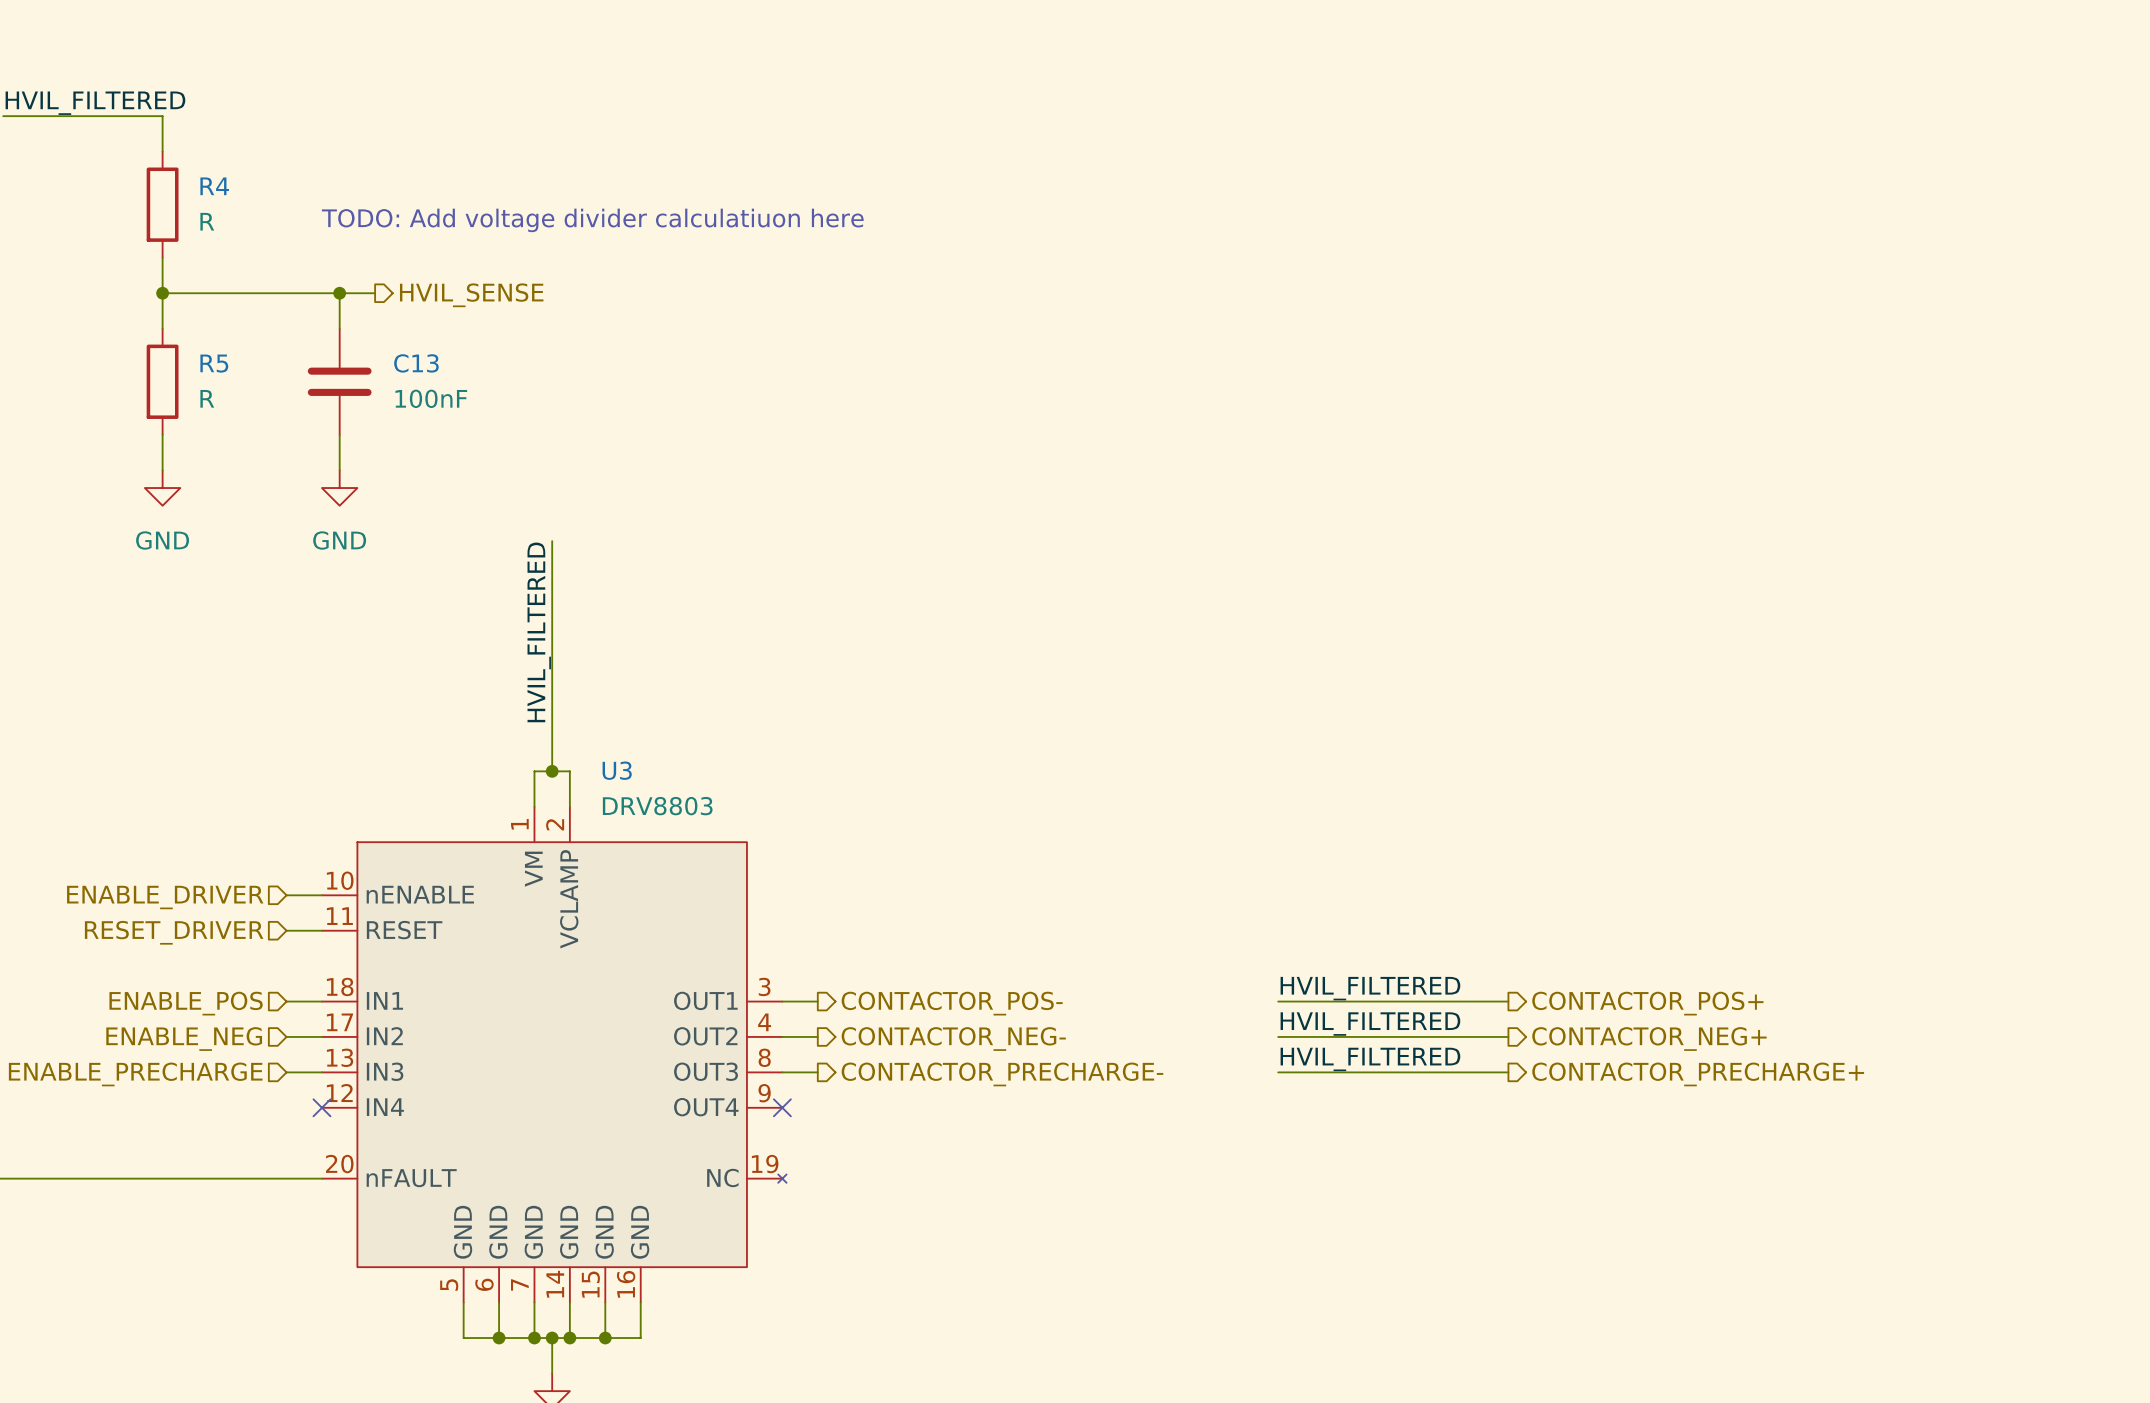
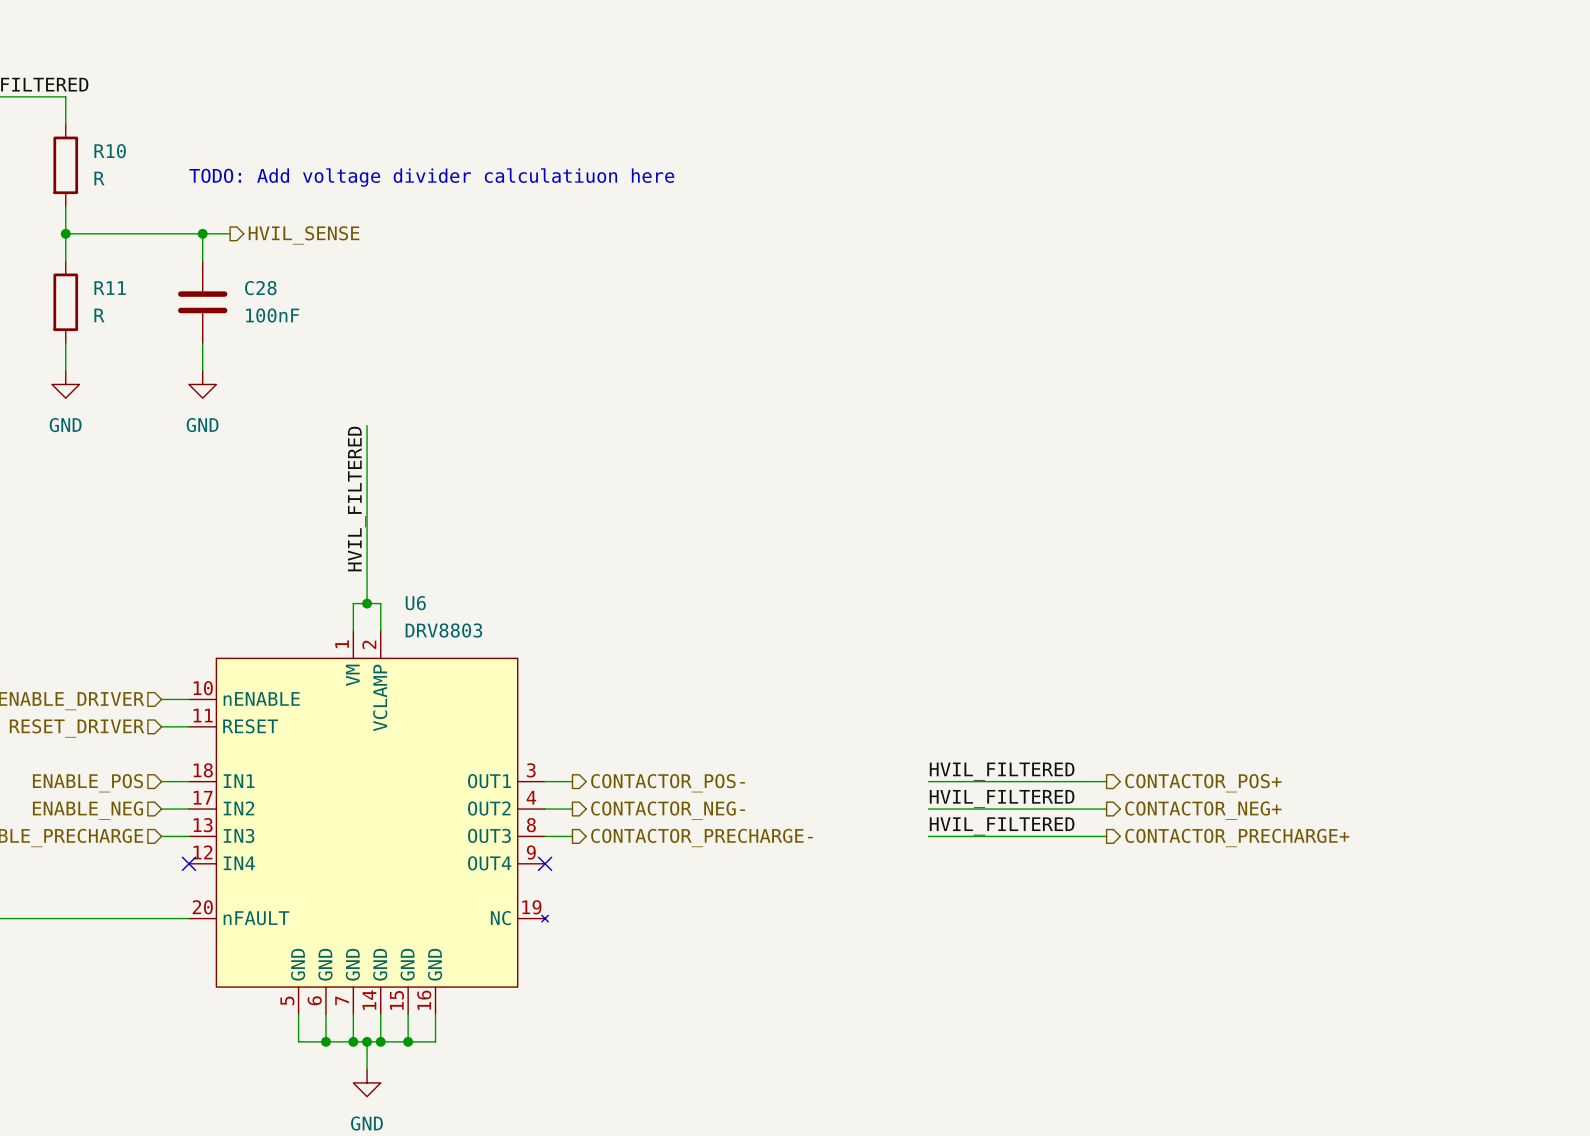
R4 name: R4 (214, 186) -> R10 (110, 151)
R5 name: R5 (214, 363) -> R11 (110, 288)
C13 name: C13 (416, 363) -> C28 (260, 288)
U3 name: U3 (617, 770) -> U6 (415, 603)

